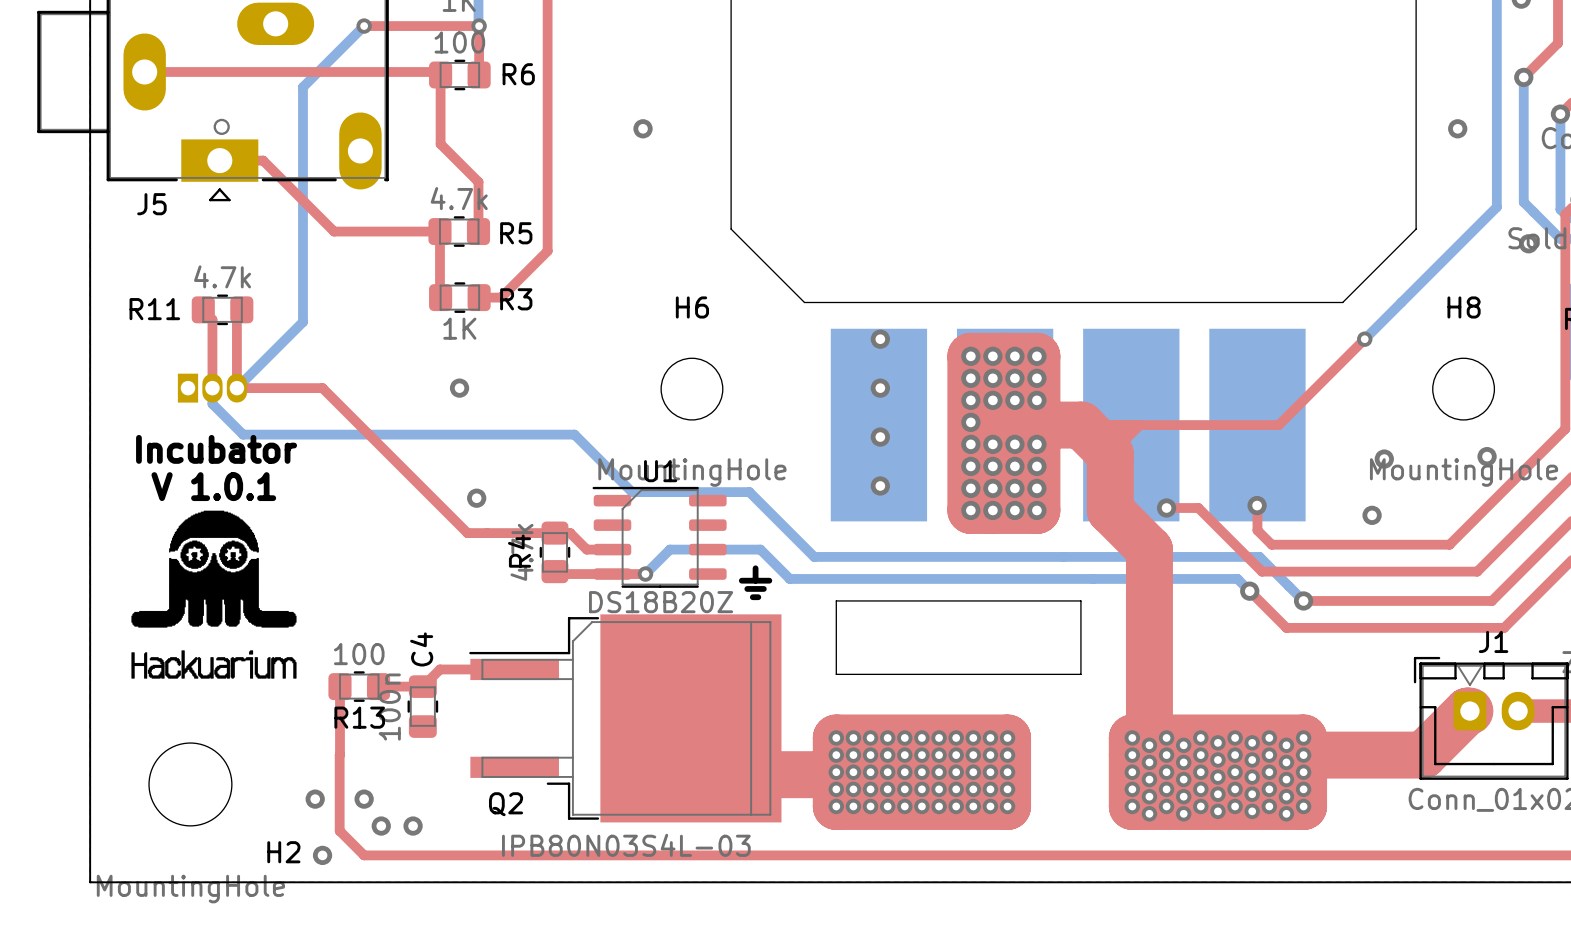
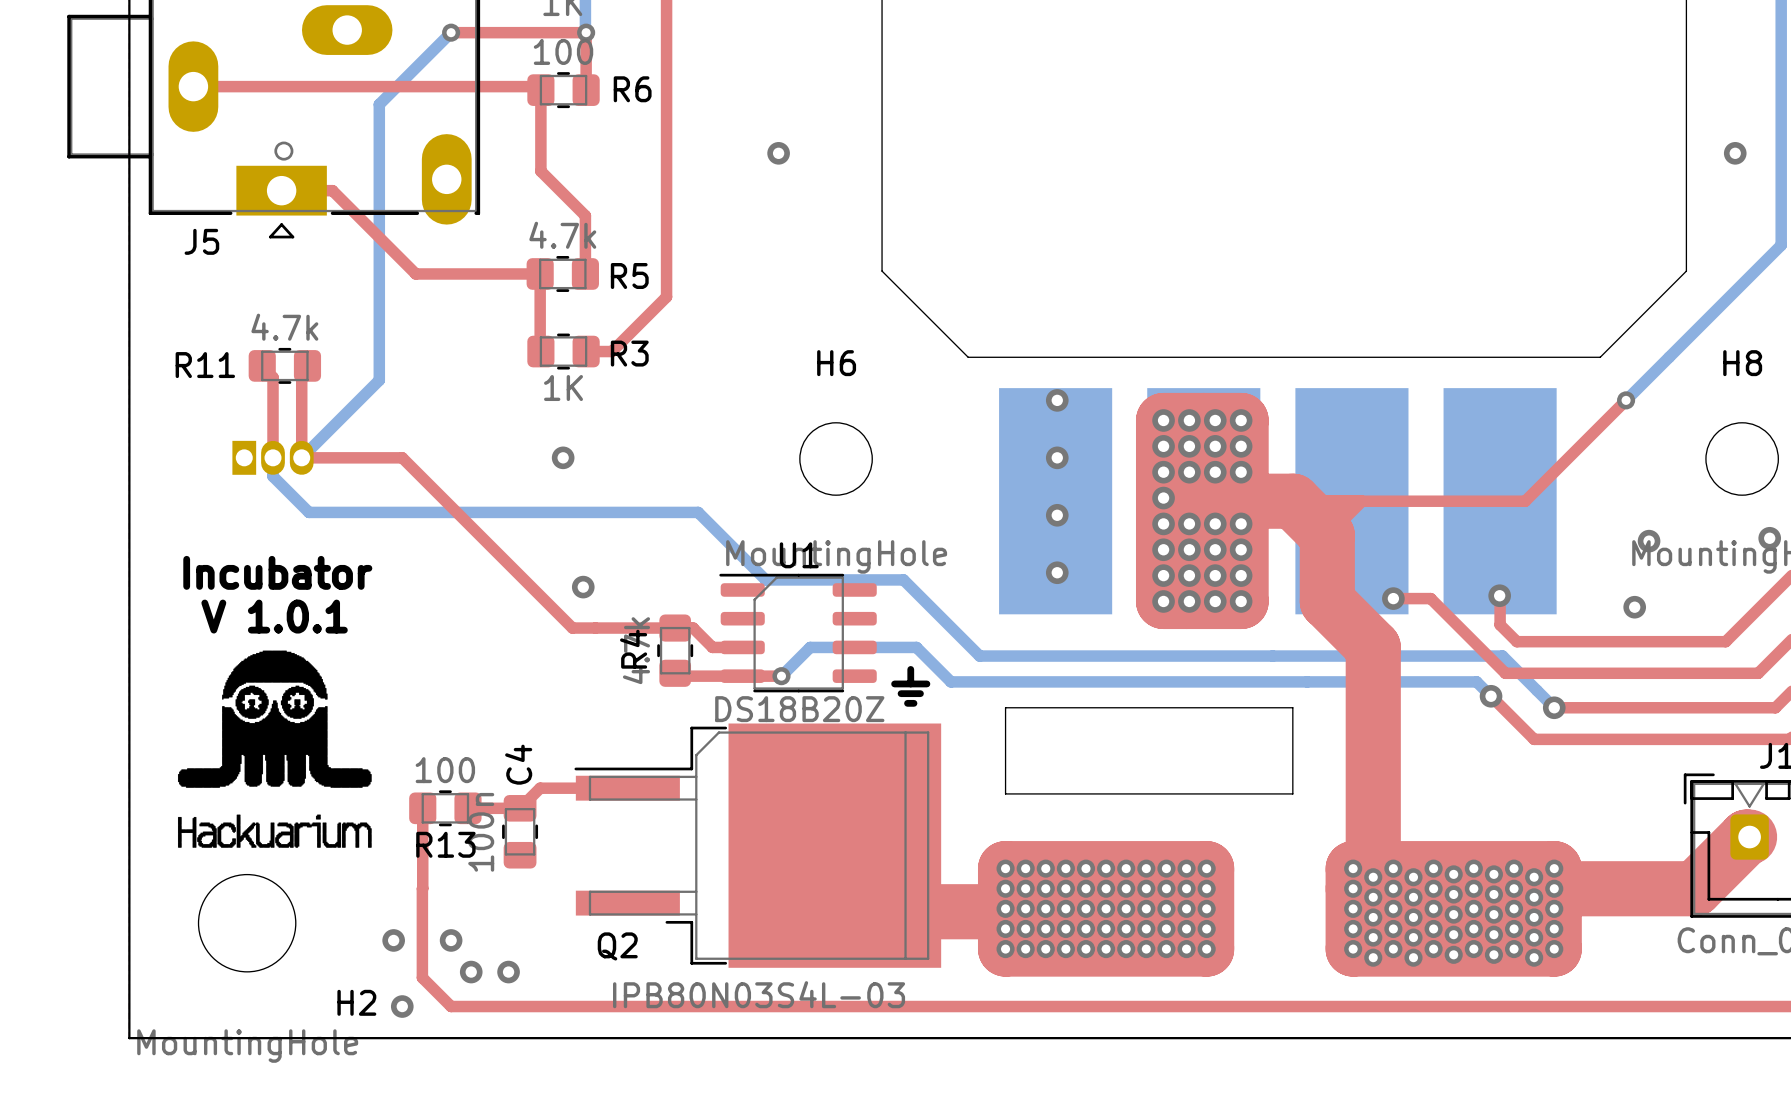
text: Incubator (216, 449) -> none
text: V 1.0.1 (213, 486) -> Incubator (277, 572)
text: none -> V 1.0.1 (274, 616)
drawing position: (213, 594) -> (274, 749)

